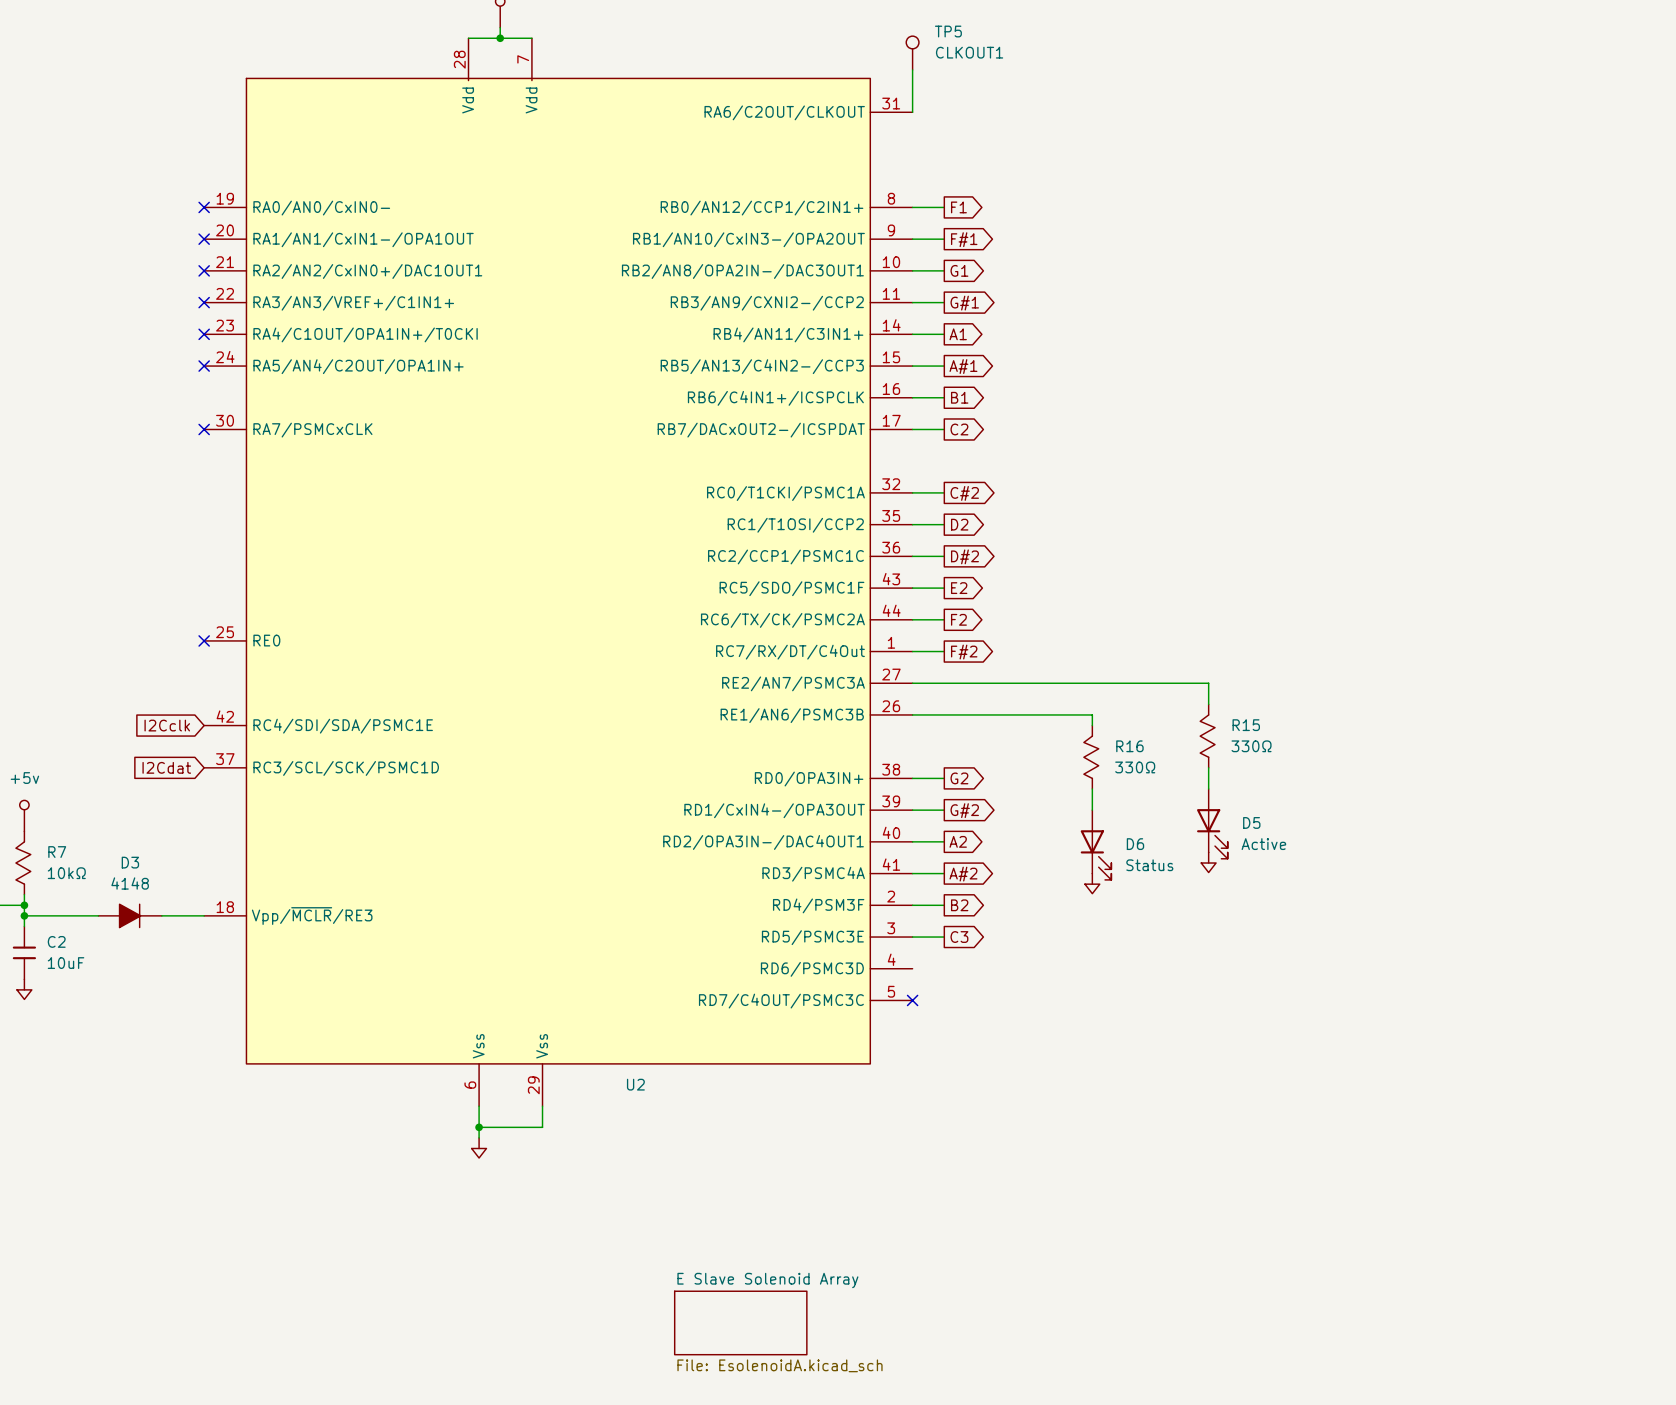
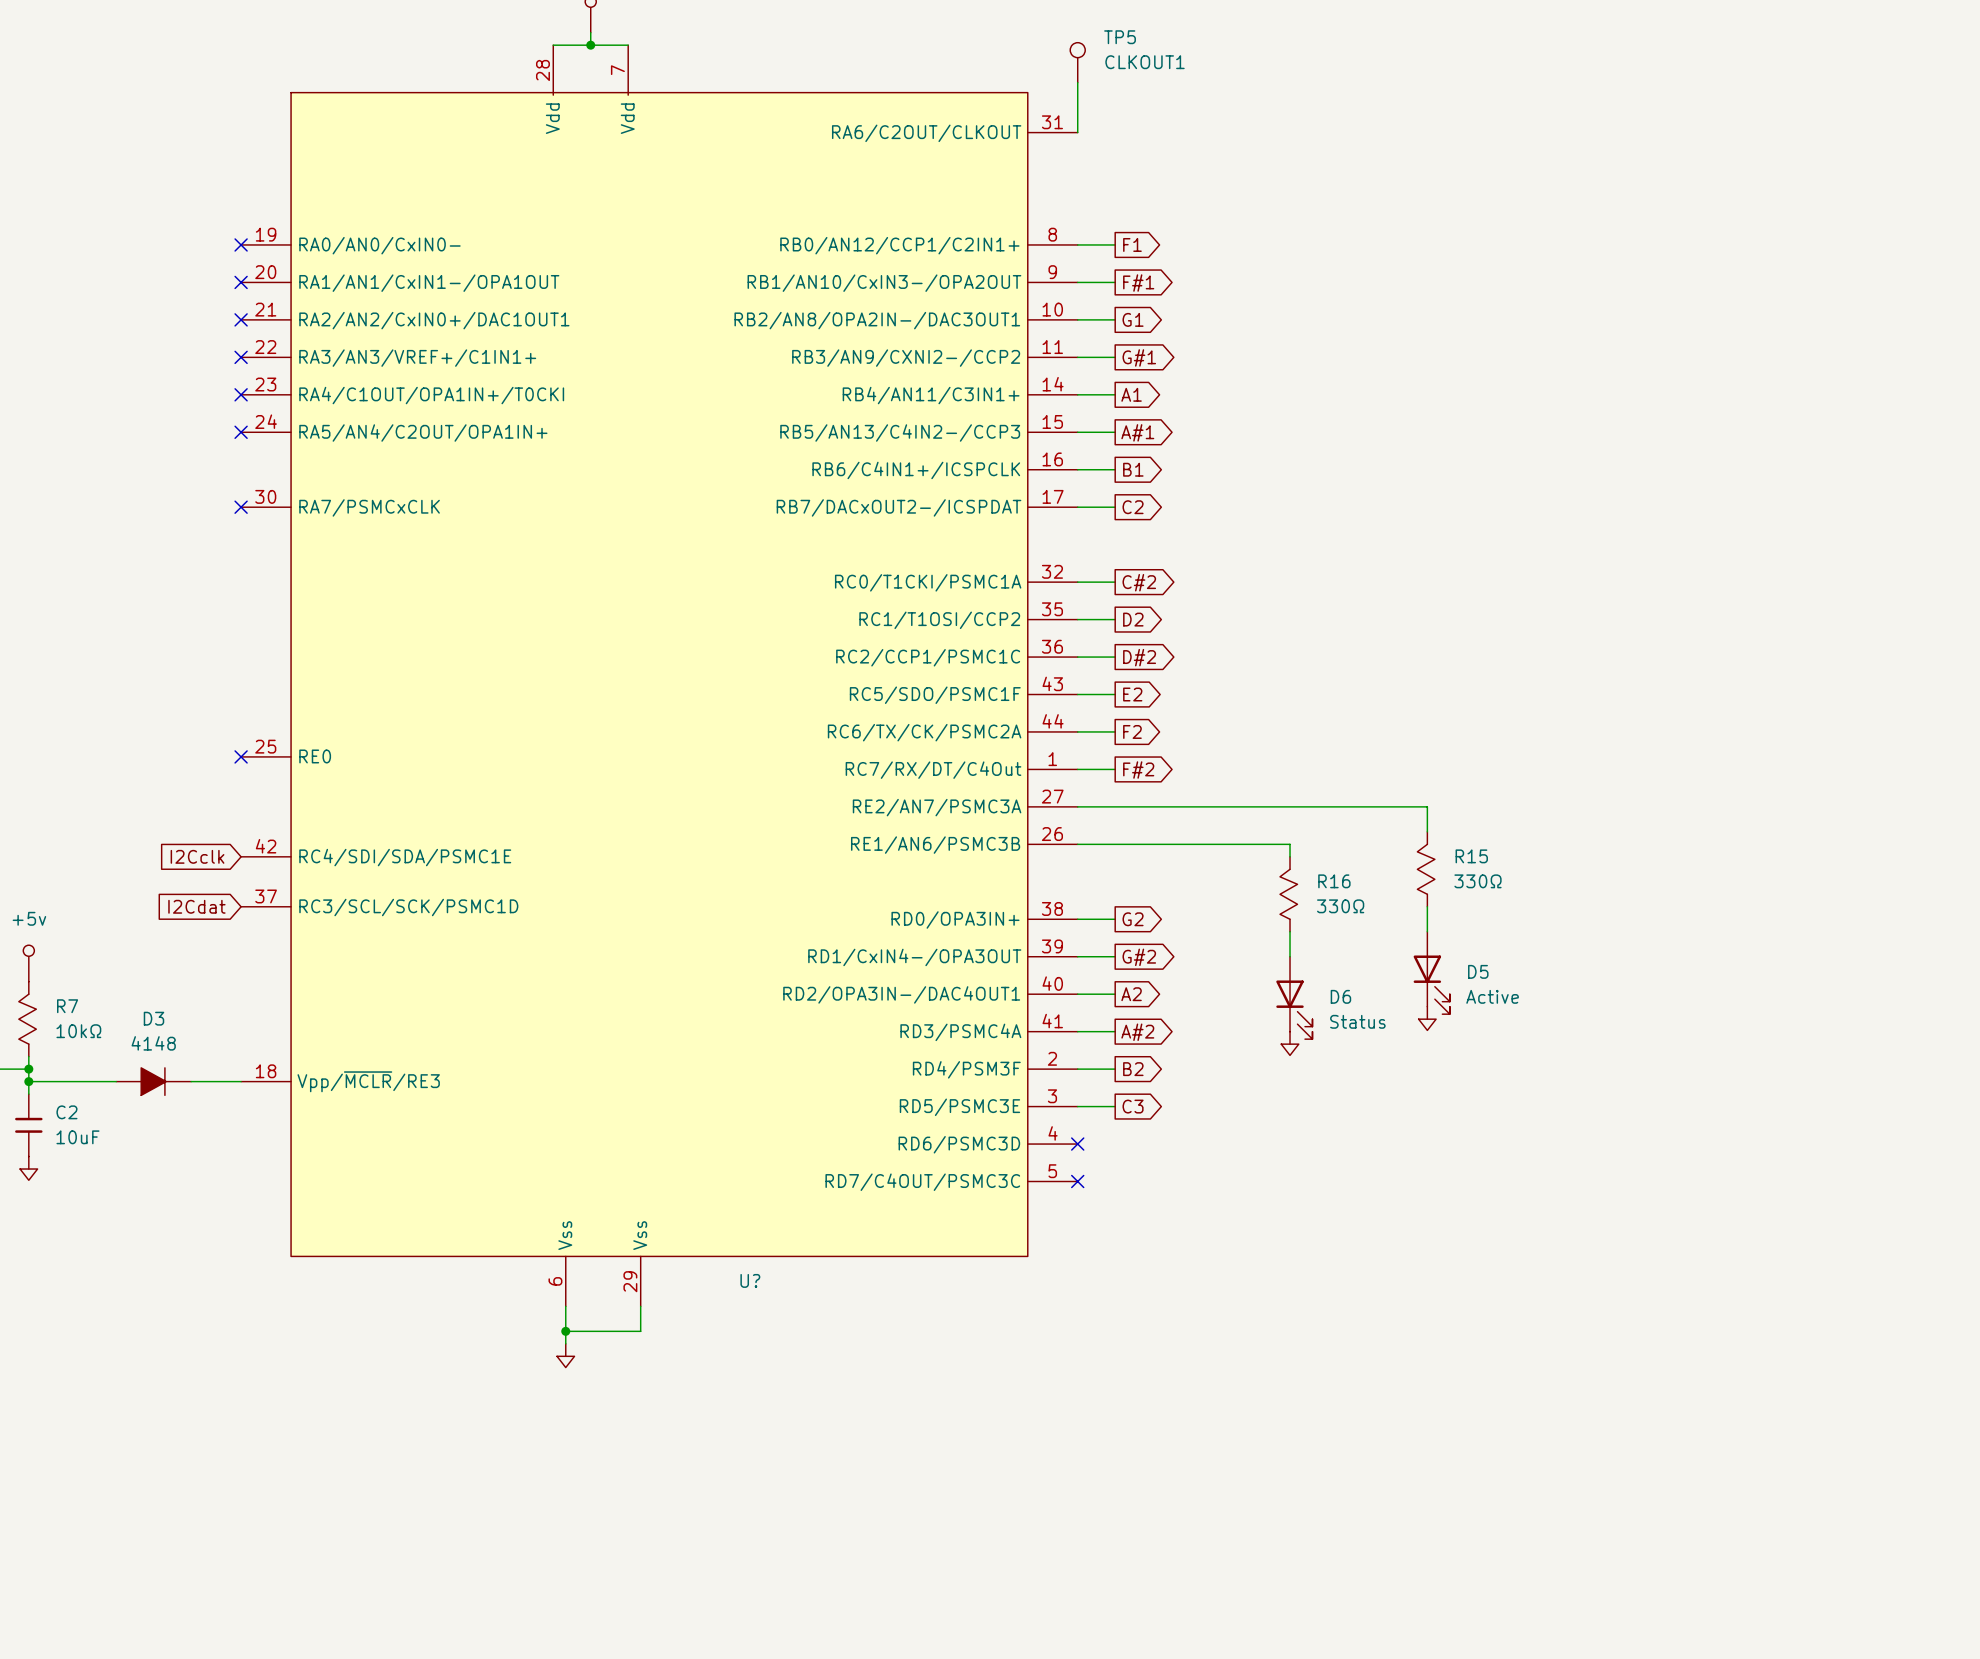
no-connect mark: none -> (1077, 1144)
U2 name: U2 (635, 1084) -> U? (750, 1280)
sheet E Slave Solenoid Array: File: EsolenoidA.kicad_sch (740, 1322) -> none

